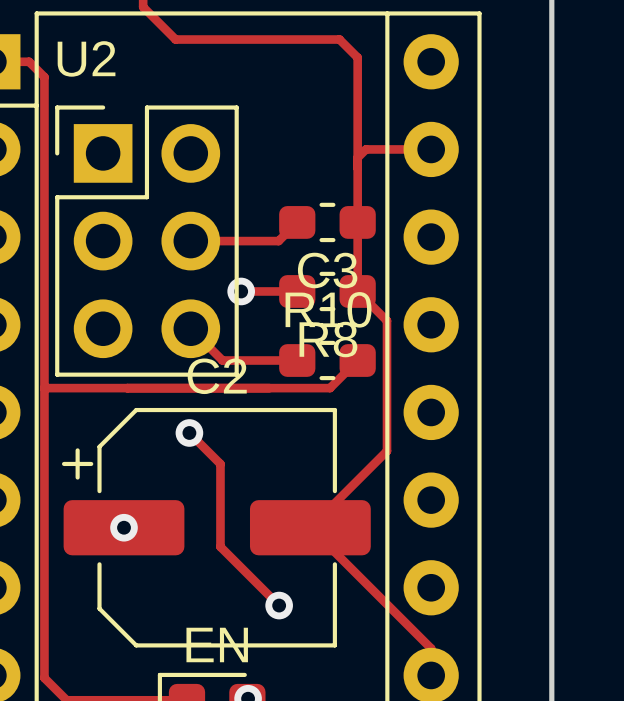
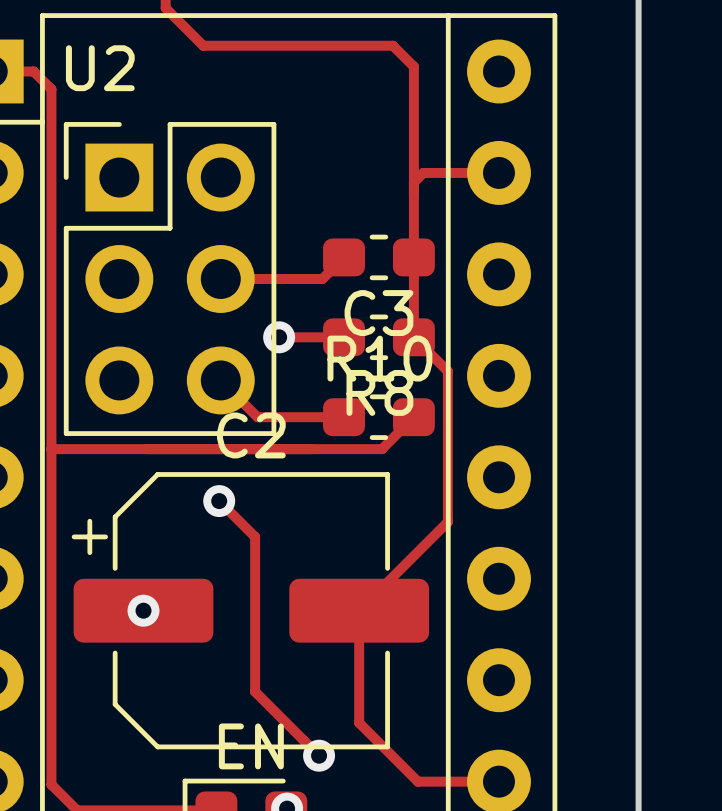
track: (310, 527) (431, 648) (431, 675) -> (359, 610) (359, 722) (417, 781) (498, 781)
track: (220, 546) (279, 605) -> (255, 632) (255, 691) (319, 755)
via position: (279, 605) -> (319, 755)

